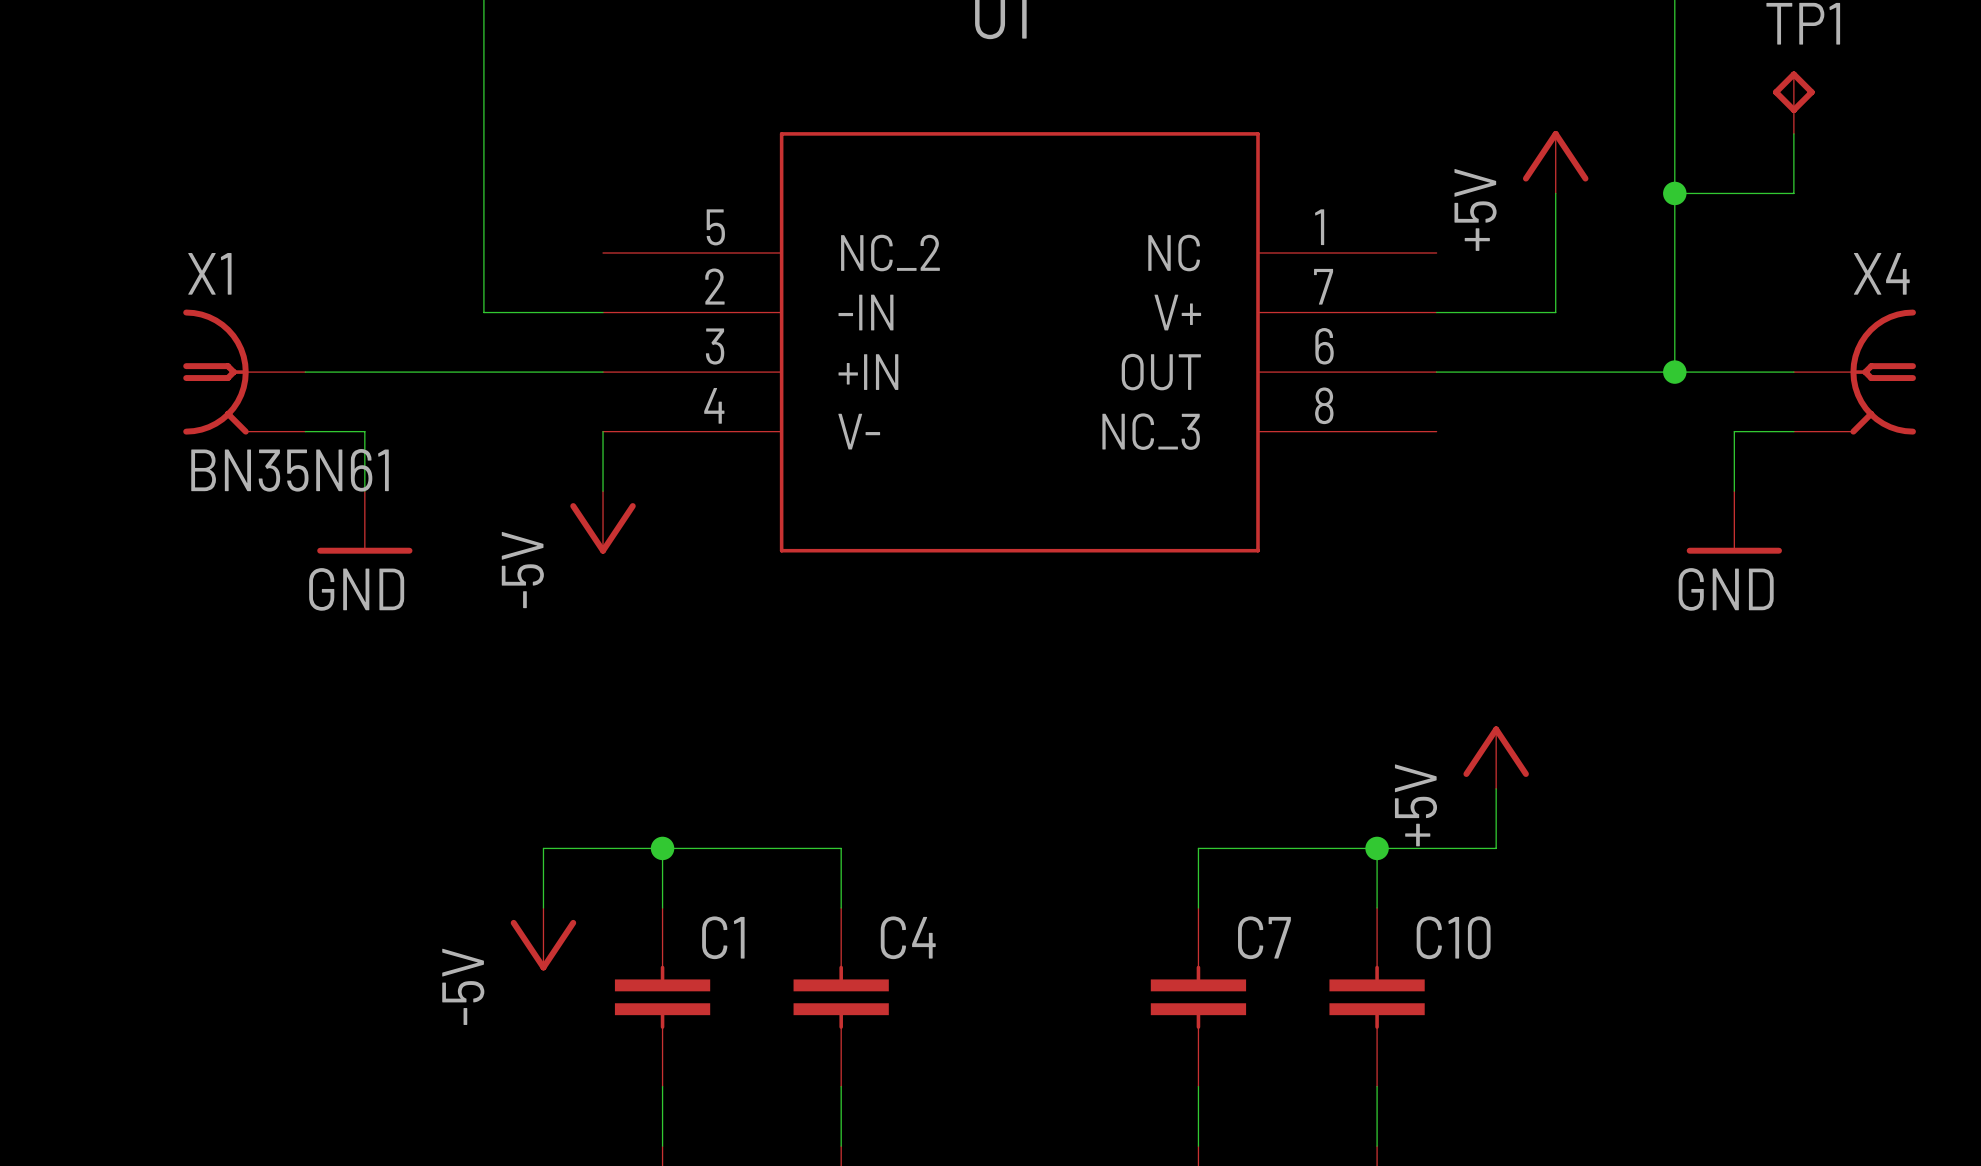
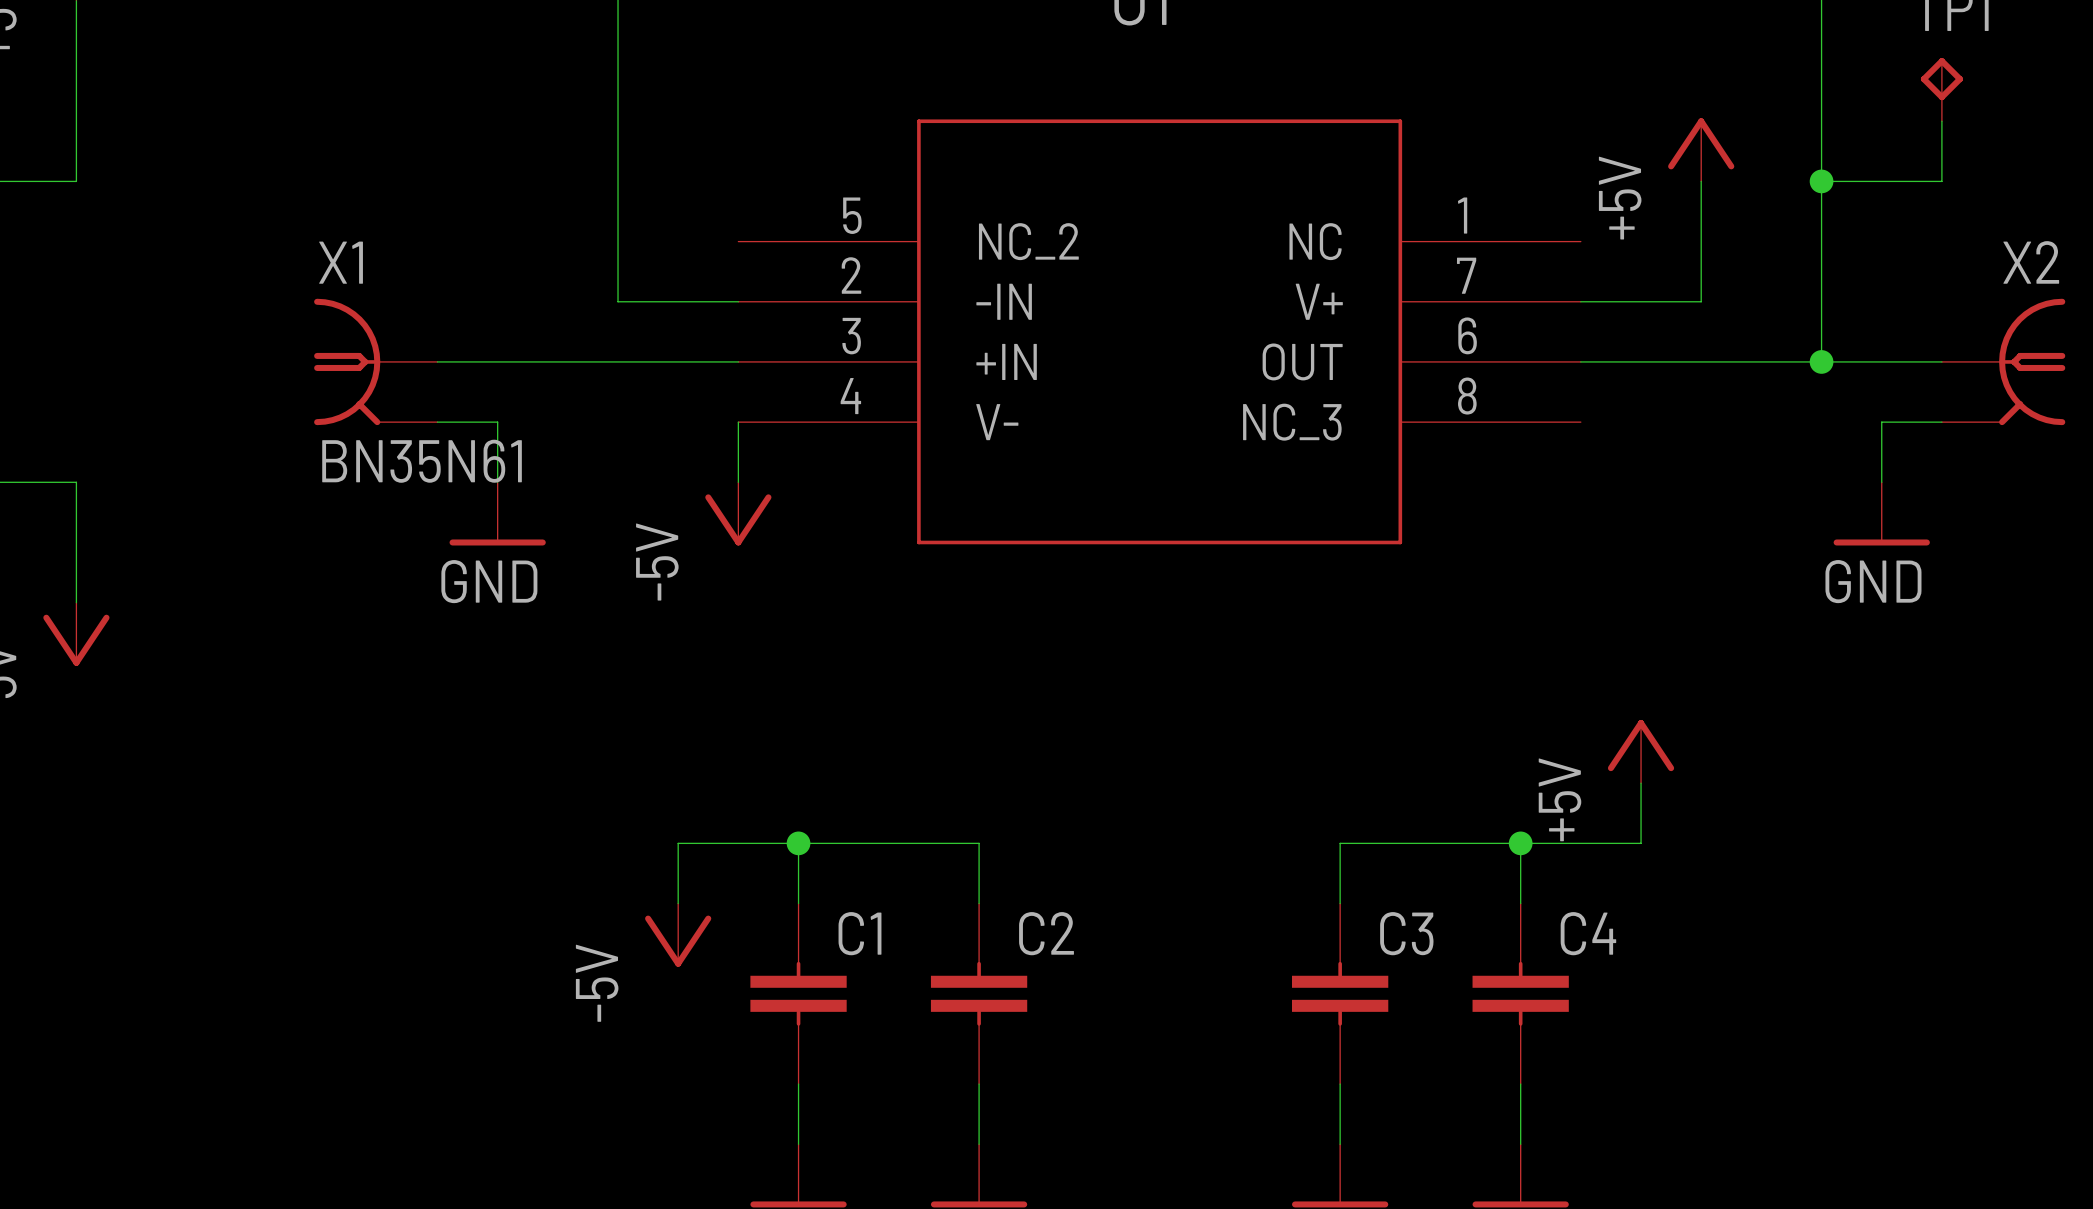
X4 name: X4 (1881, 273) -> X2 (2031, 262)
C4 name: C4 (908, 937) -> C2 (1046, 933)
C7 name: C7 (1264, 937) -> C3 (1406, 933)
C10 name: C10 (1453, 937) -> C4 (1588, 933)

